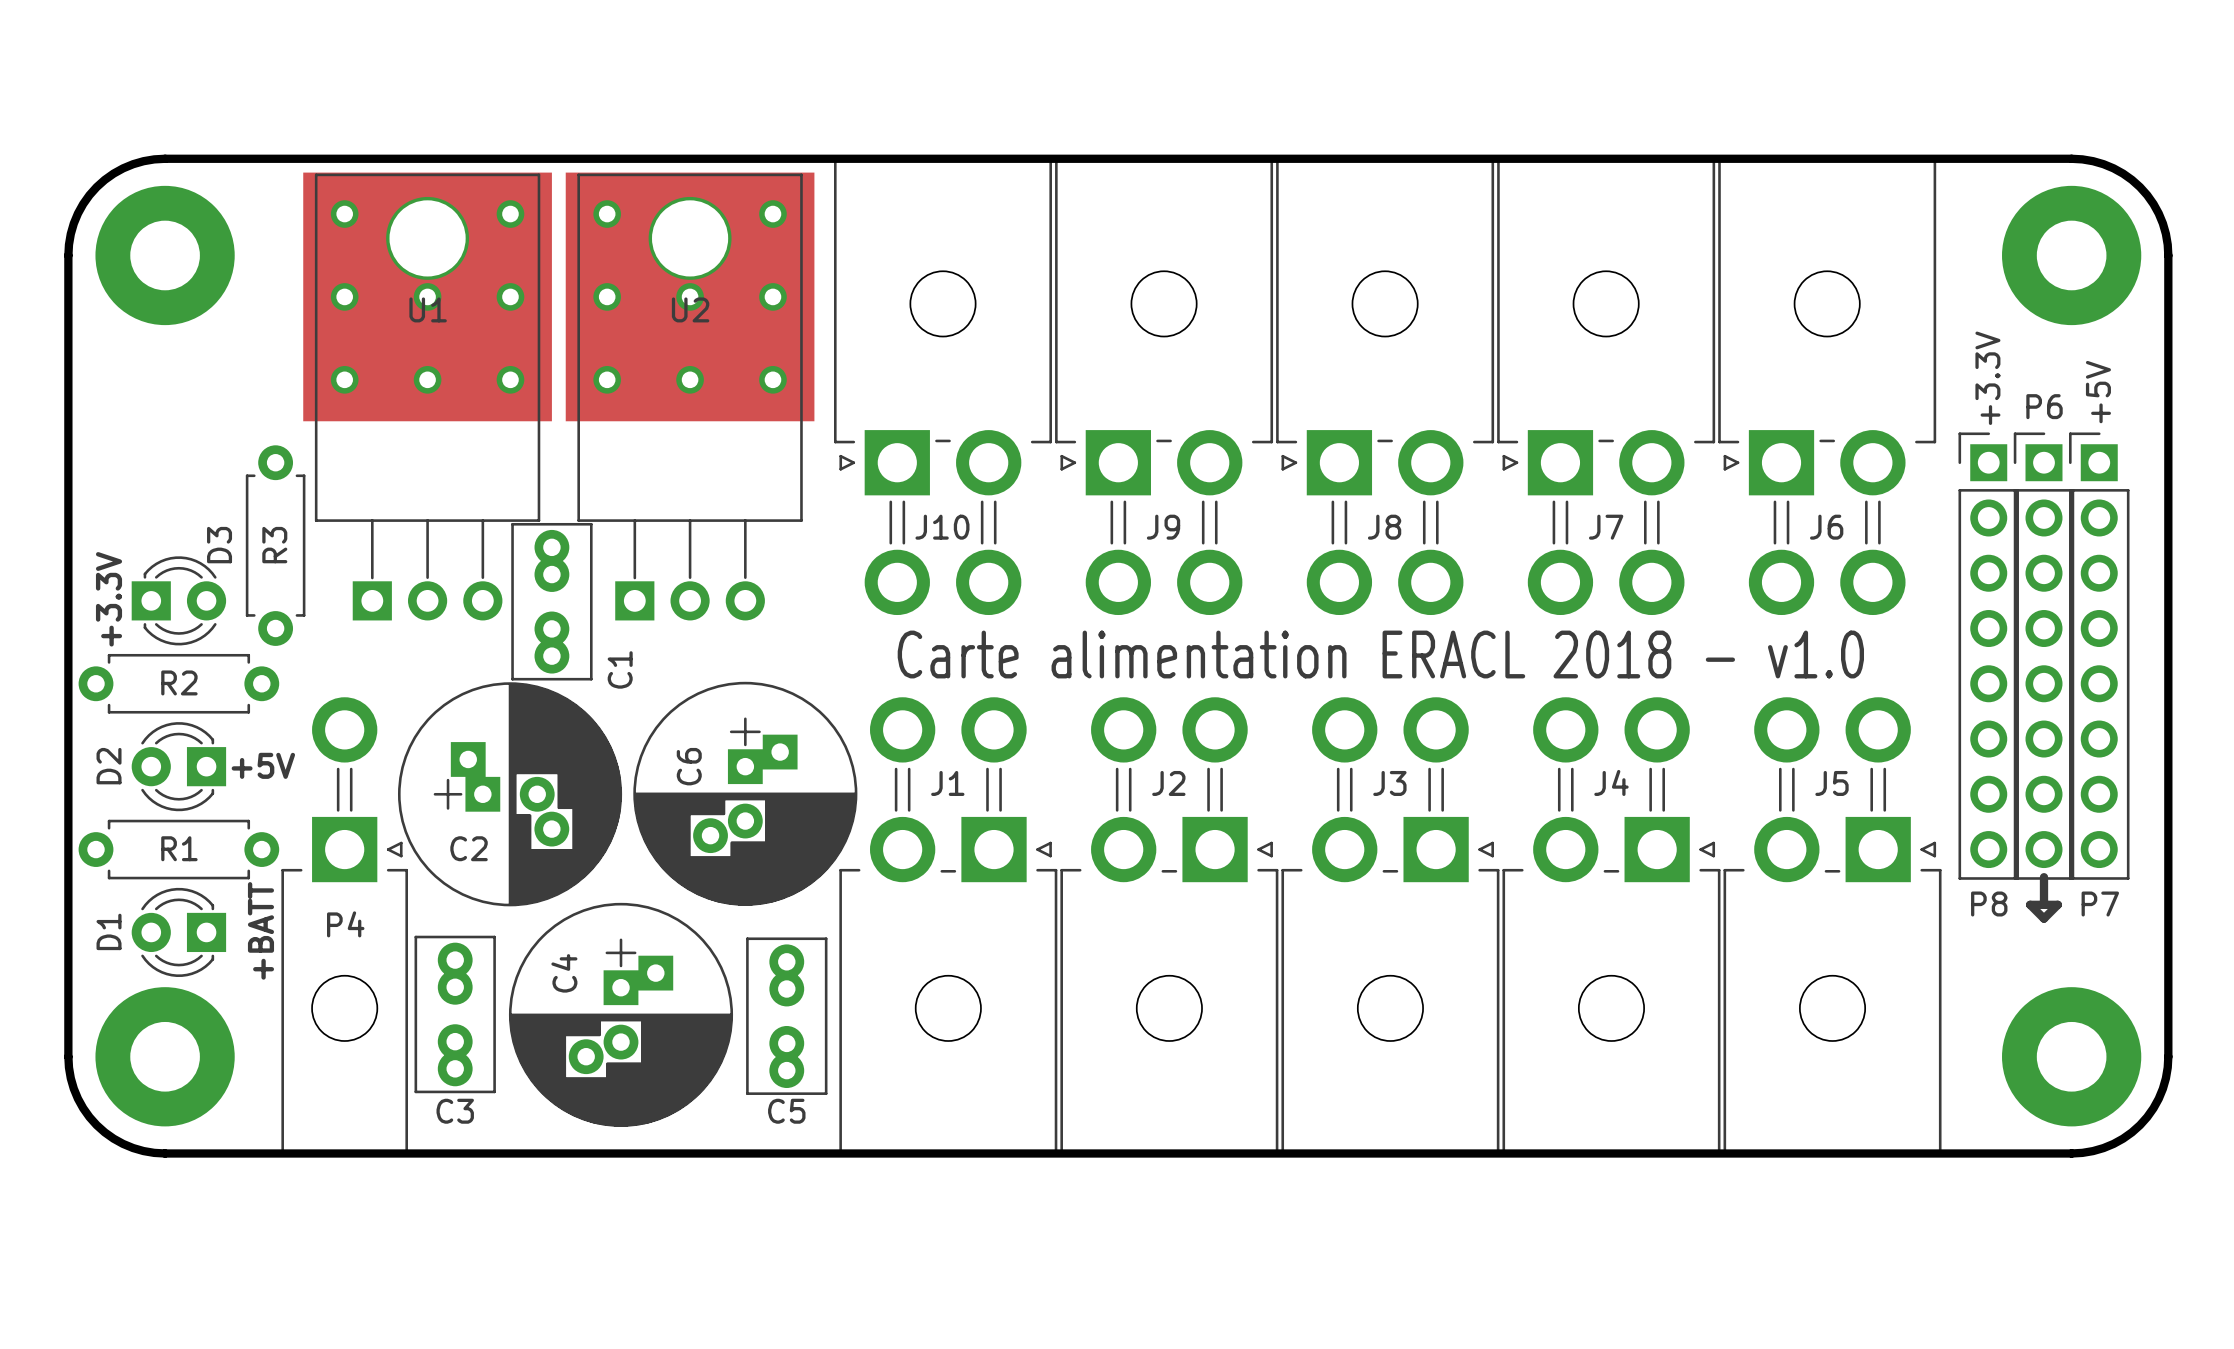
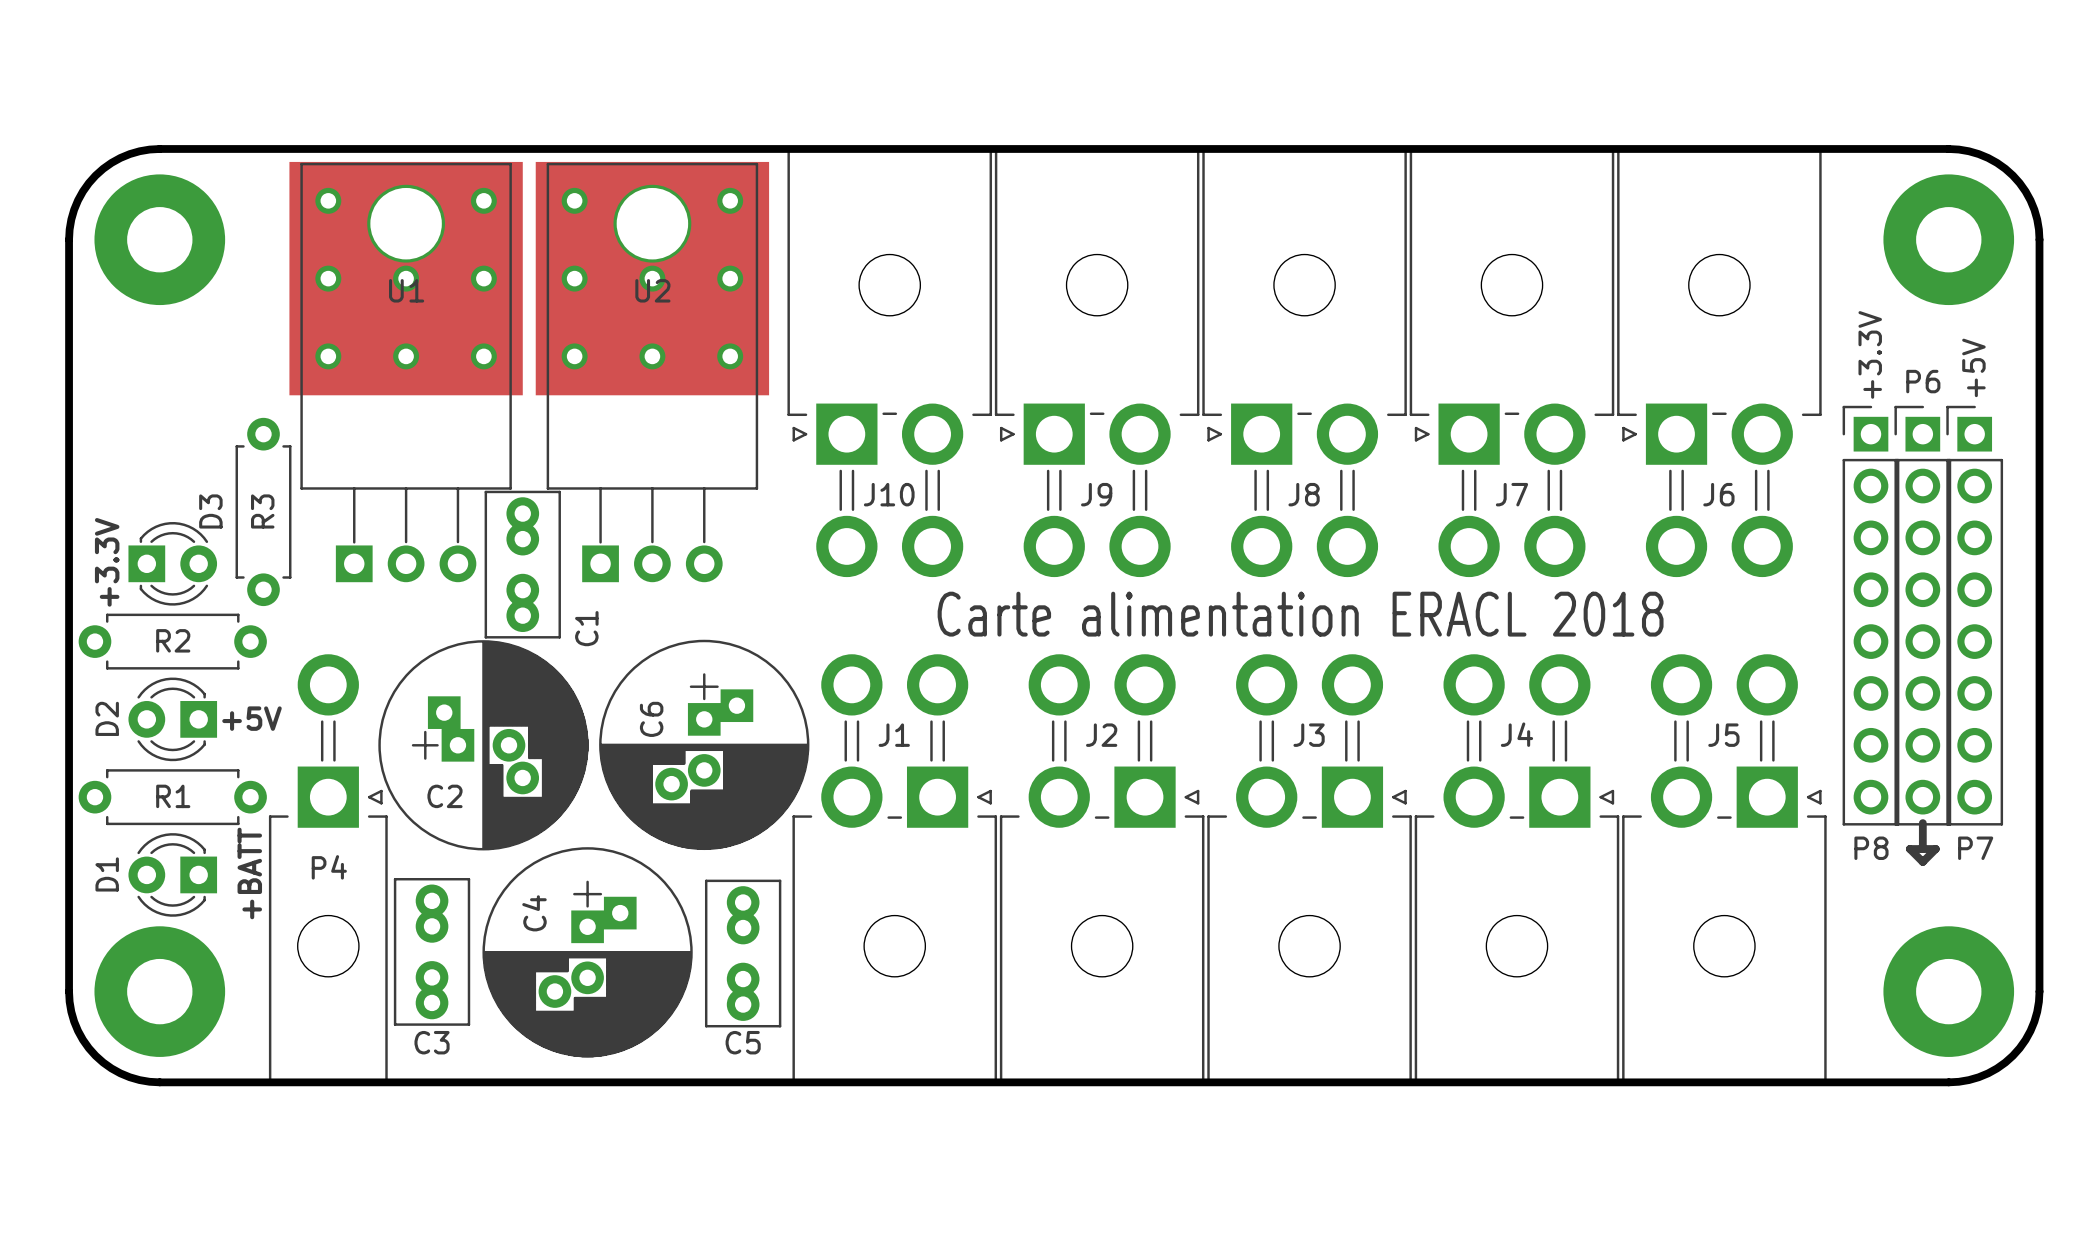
text: Carte alimentation ERACL 2018 - v1.0 (1380, 654) -> Carte alimentation ERACL 2018 (1300, 614)

